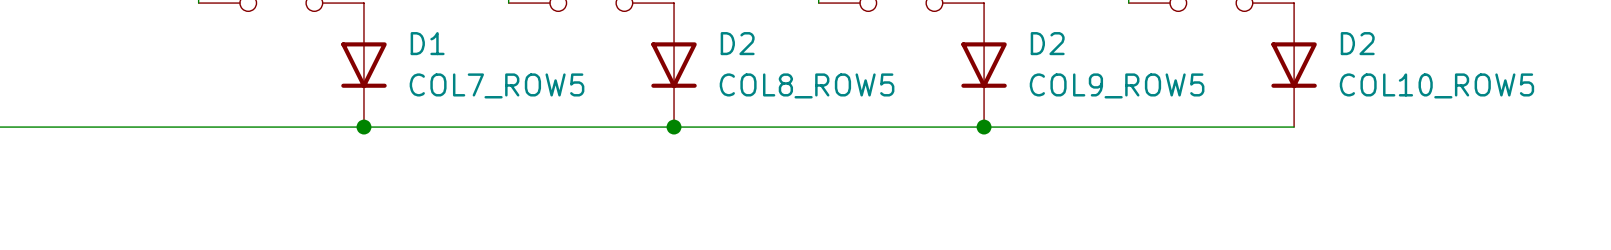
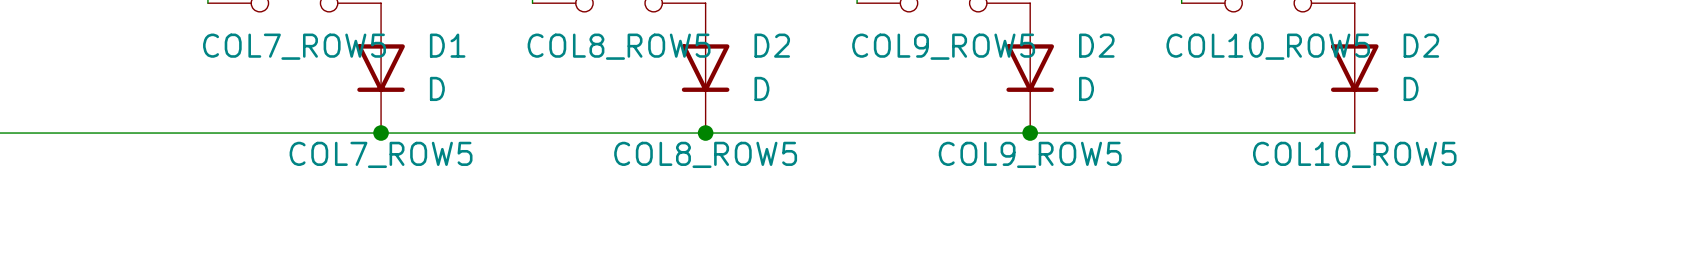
part text: none -> COL7_ROW5 (294, 46)
part text: none -> COL8_ROW5 (619, 46)
part text: none -> COL9_ROW5 (943, 46)
part text: none -> COL10_ROW5 (1268, 46)
D1 value: COL7_ROW5 (497, 85) -> D (437, 88)
D2 value: COL8_ROW5 (807, 85) -> D (761, 88)
D2 value: COL9_ROW5 (1117, 85) -> D (1086, 88)
D2 value: COL10_ROW5 (1436, 85) -> D (1411, 88)
D1 text: none -> COL7_ROW5 (381, 154)
D2 text: none -> COL8_ROW5 (705, 154)
D2 text: none -> COL9_ROW5 (1030, 154)
D2 text: none -> COL10_ROW5 (1354, 154)

